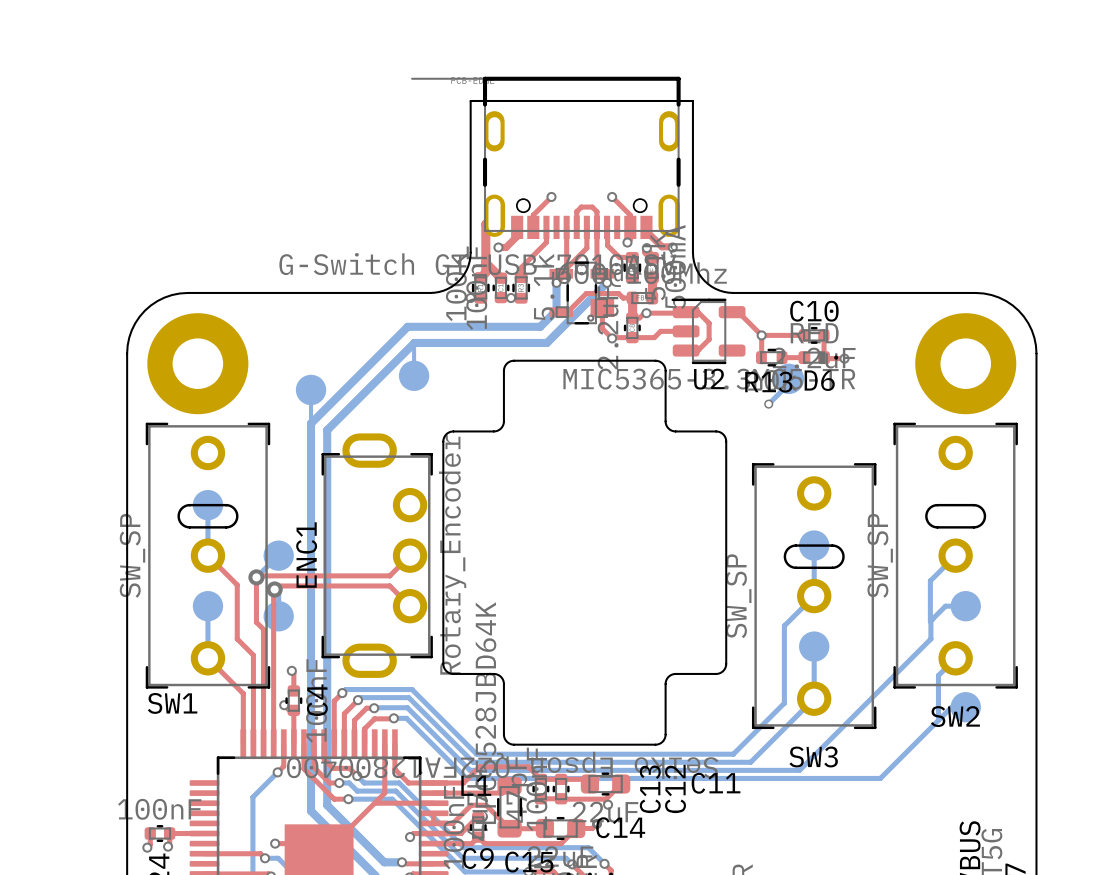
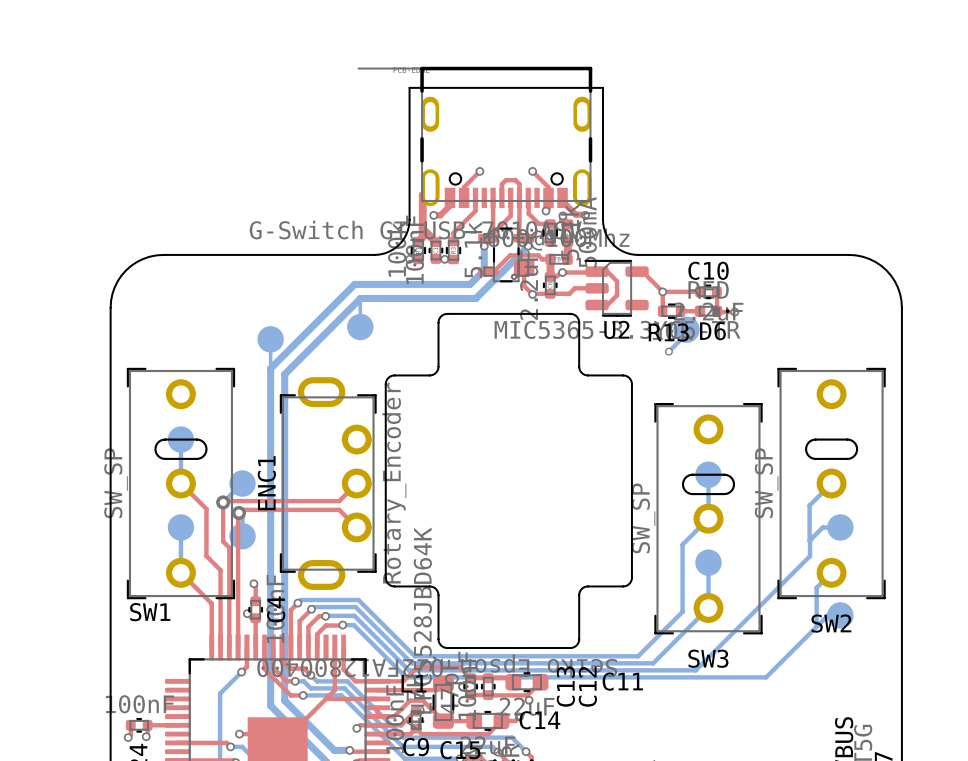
part: (197, 363) -> none
part: (965, 363) -> none

